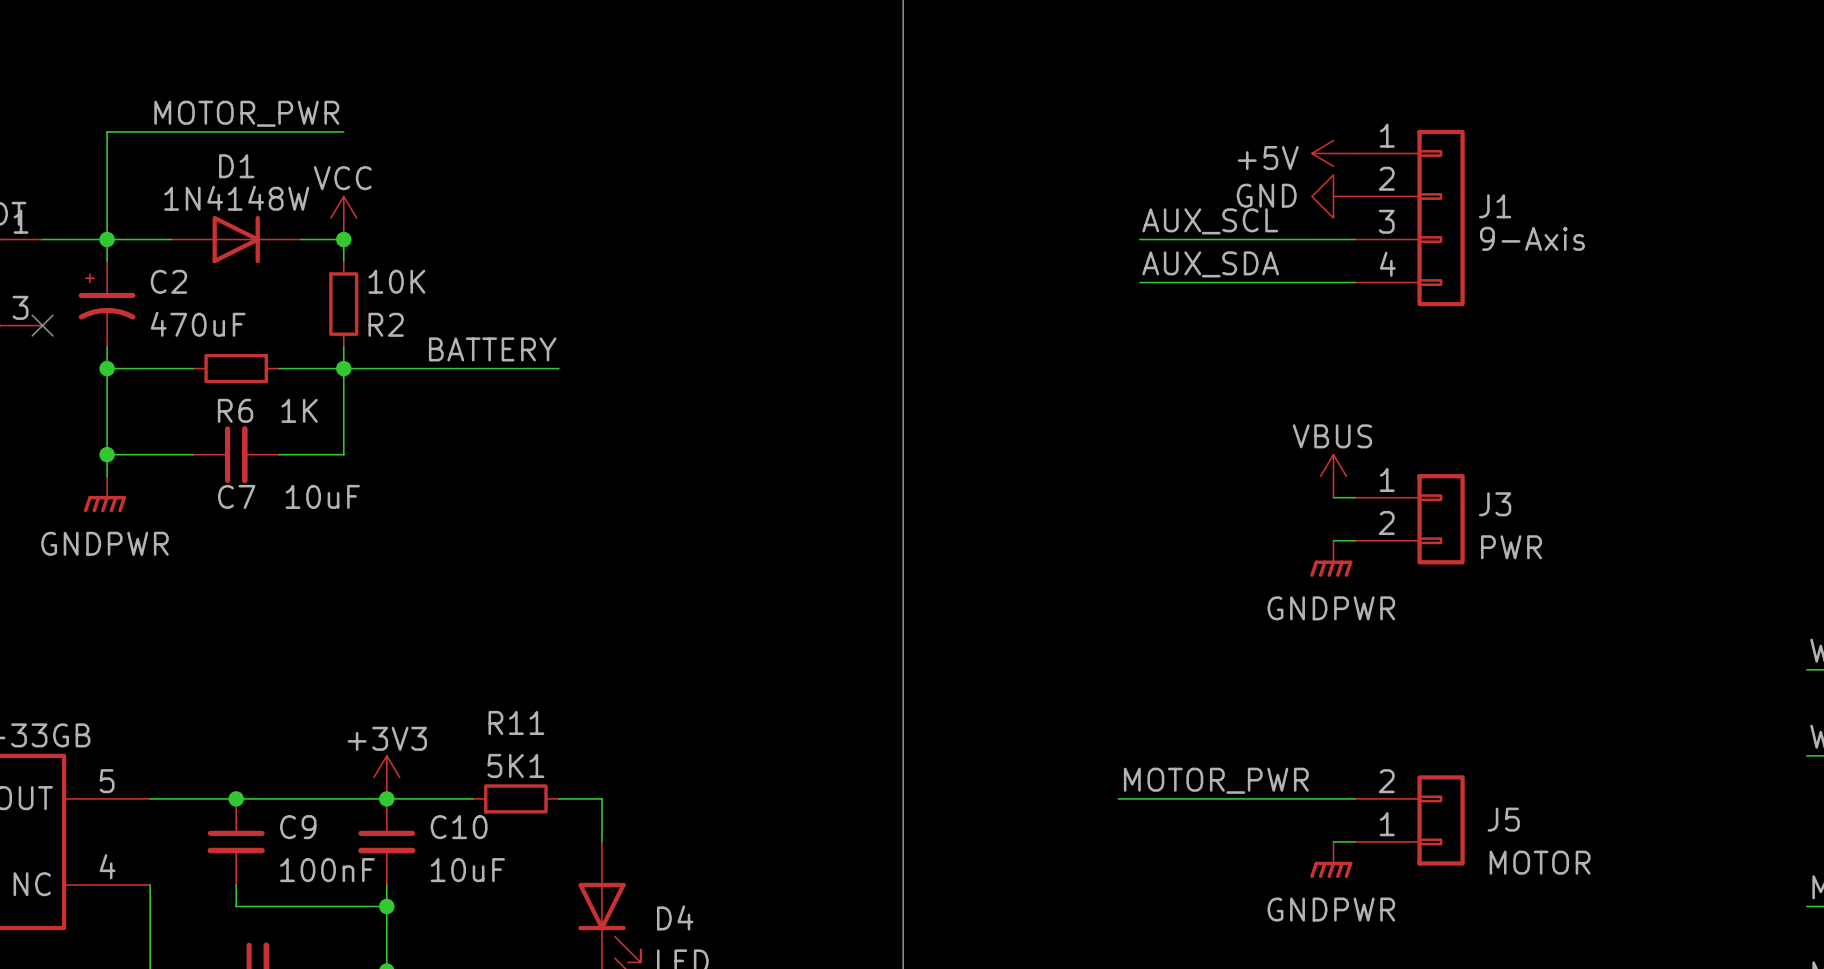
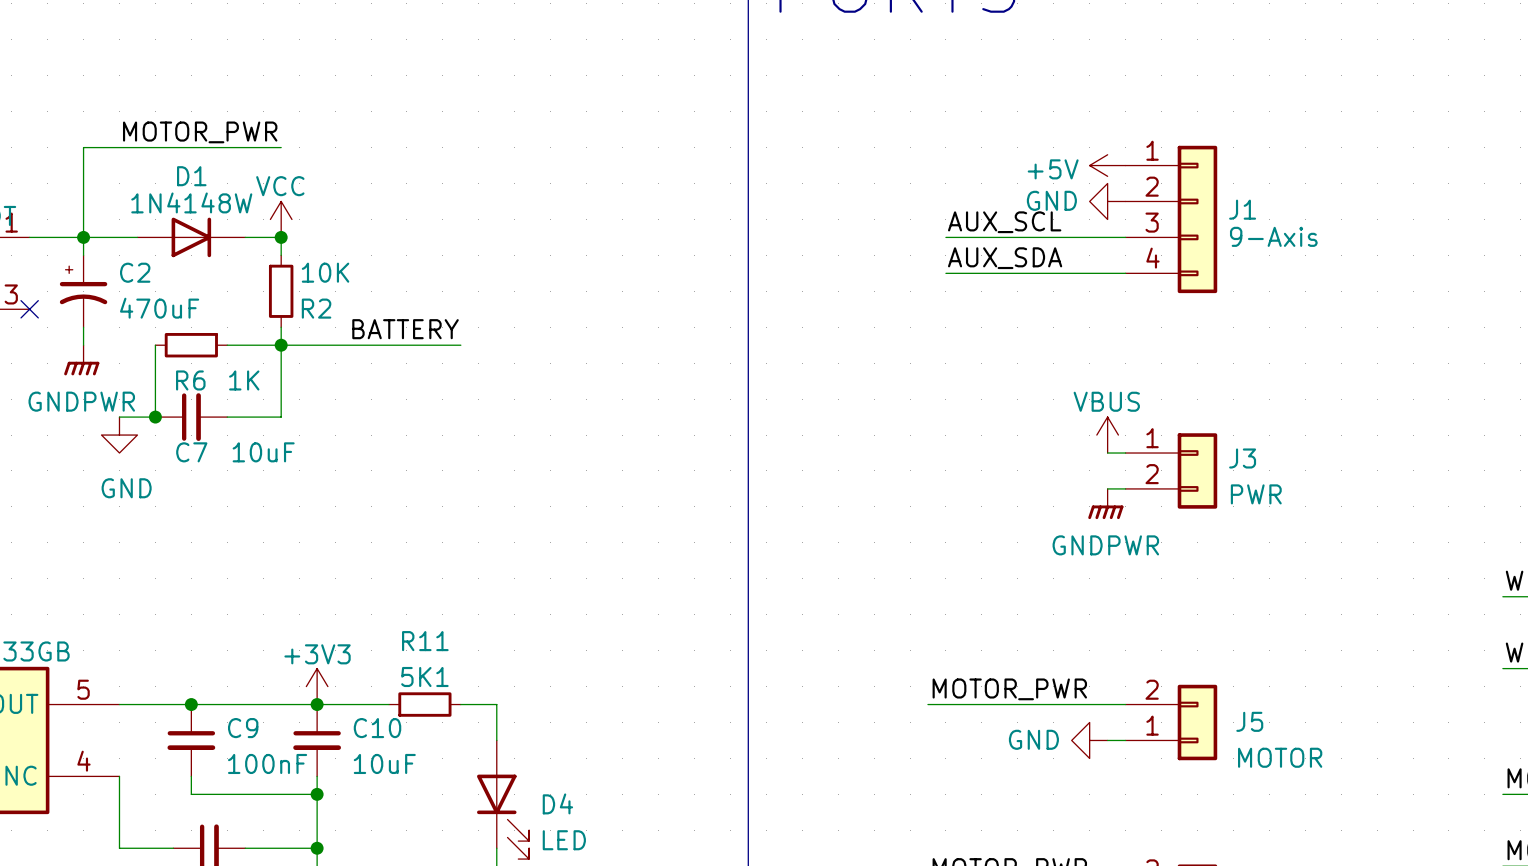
junction: (107, 368) -> none
wire: (193, 368) (107, 368) (107, 476) -> (155, 345) (155, 417)
wire: (107, 454) (150, 454) -> none
junction: (107, 454) -> none
junction: none -> (155, 417)
power symbol: none -> GND (119, 435)
power symbol position: GNDPWR (104, 494) -> GNDPWR (81, 360)
power symbol: none -> GND (1089, 740)
power symbol: GNDPWR (1331, 860) -> none

